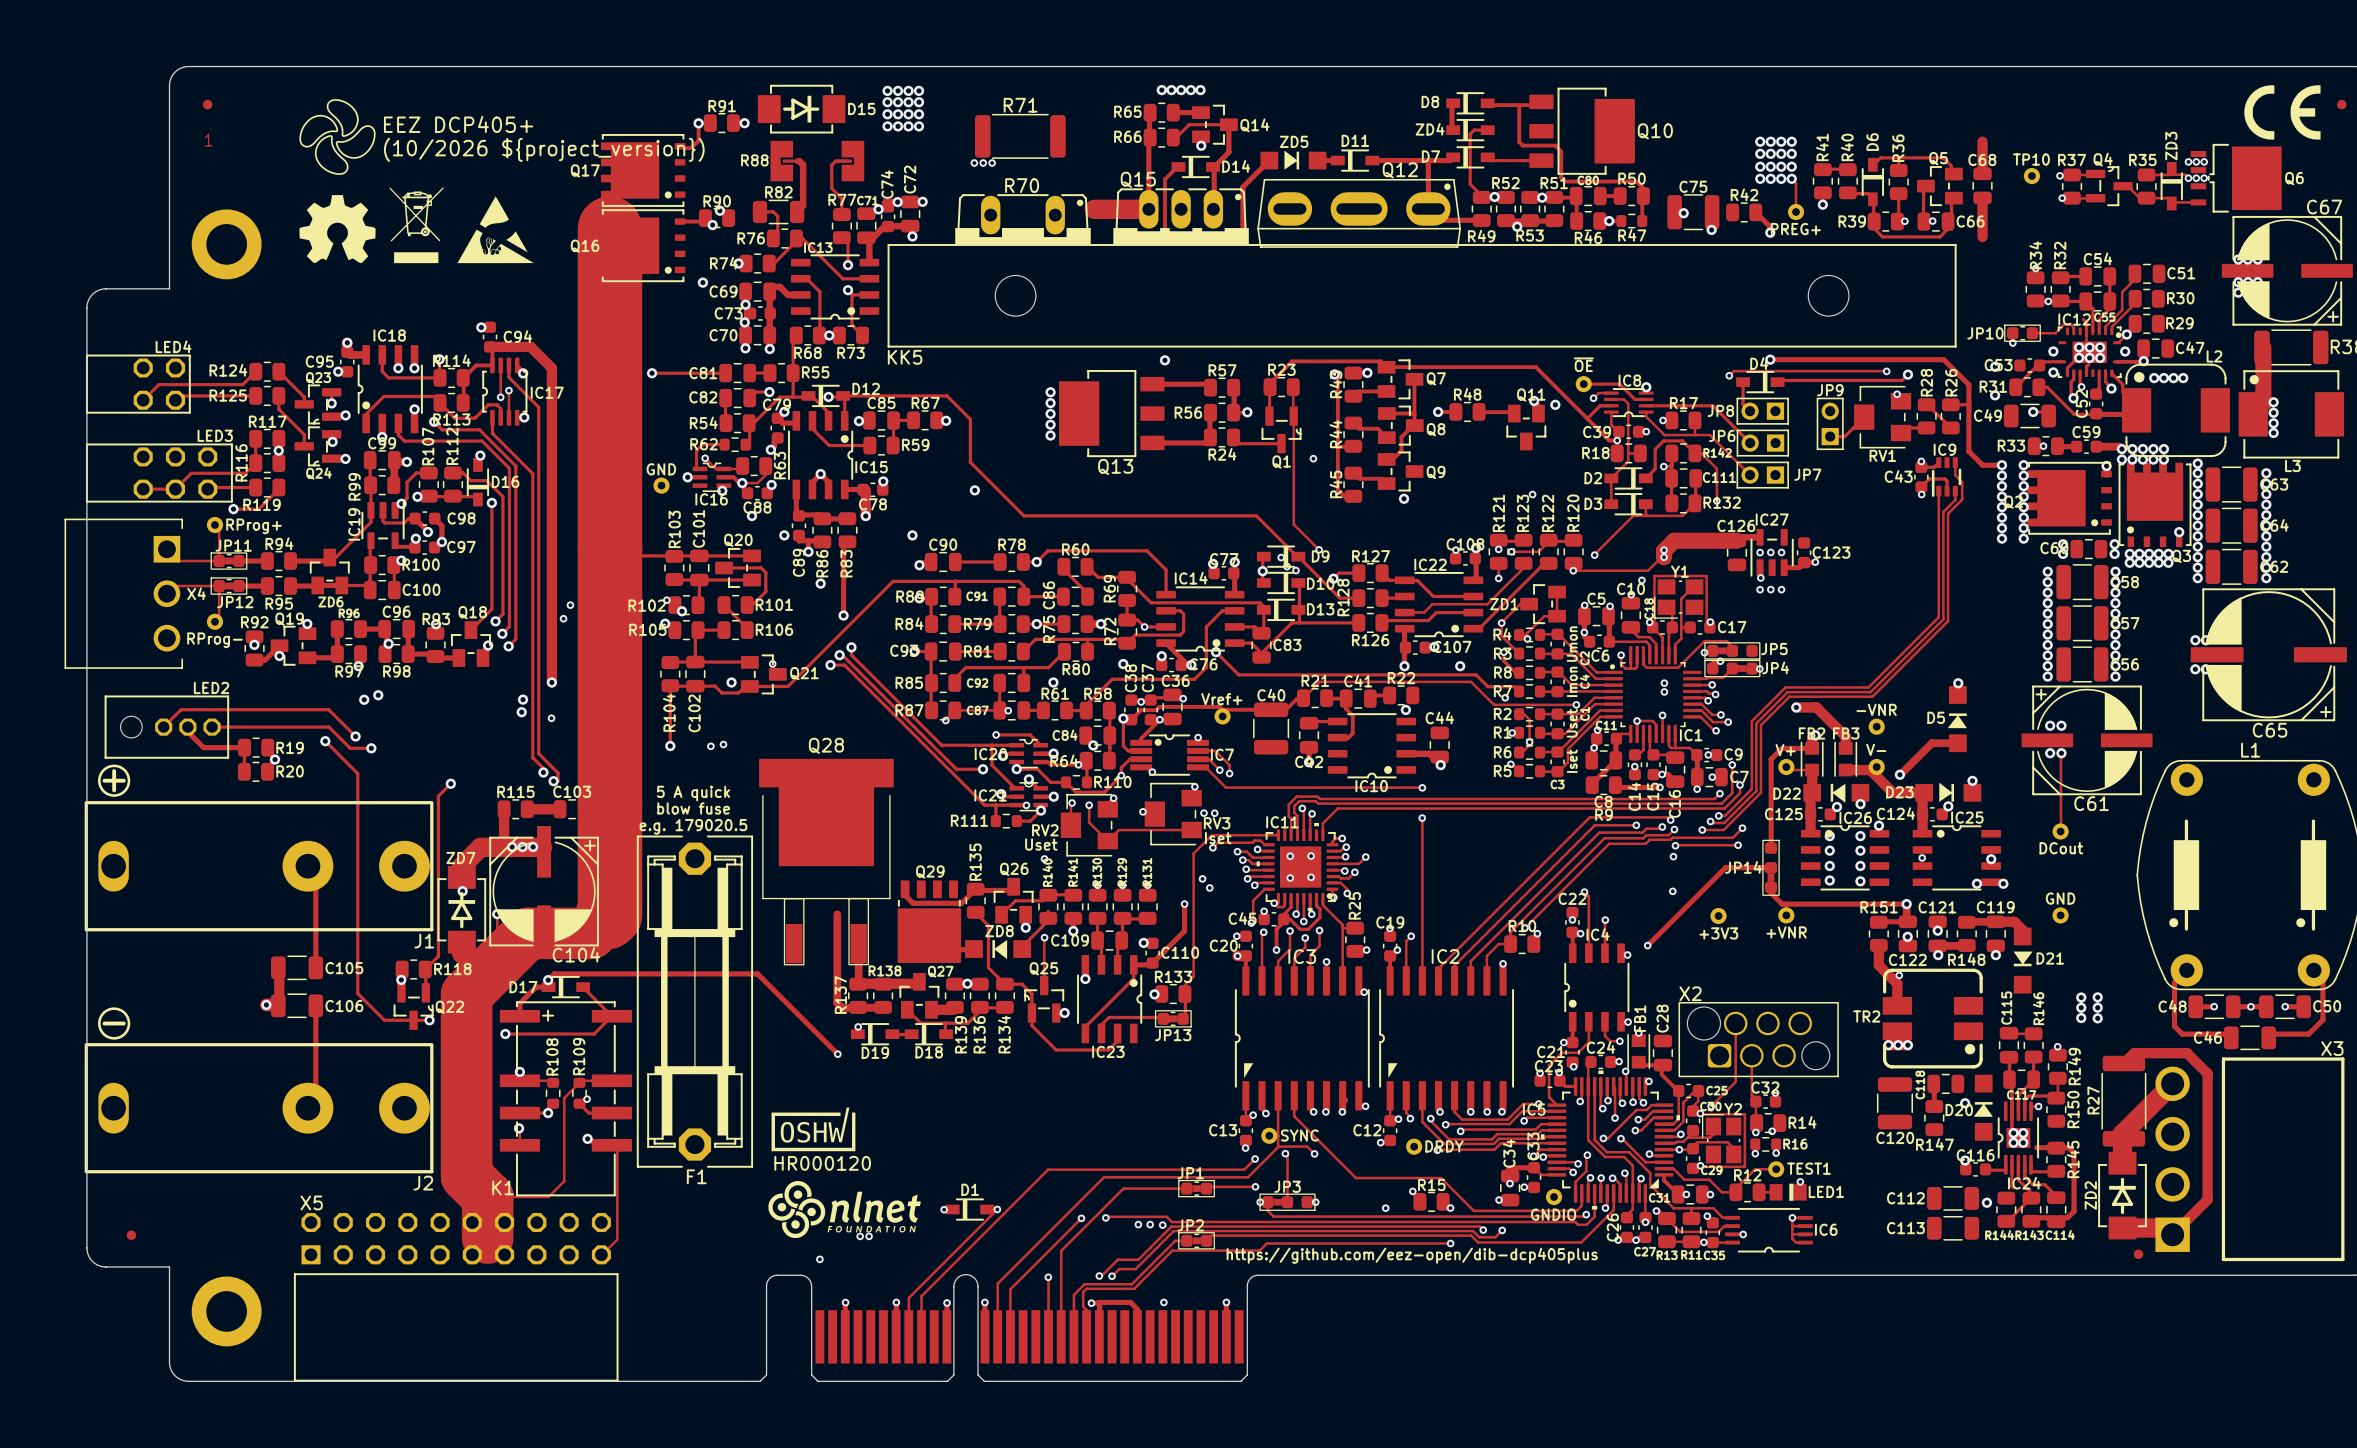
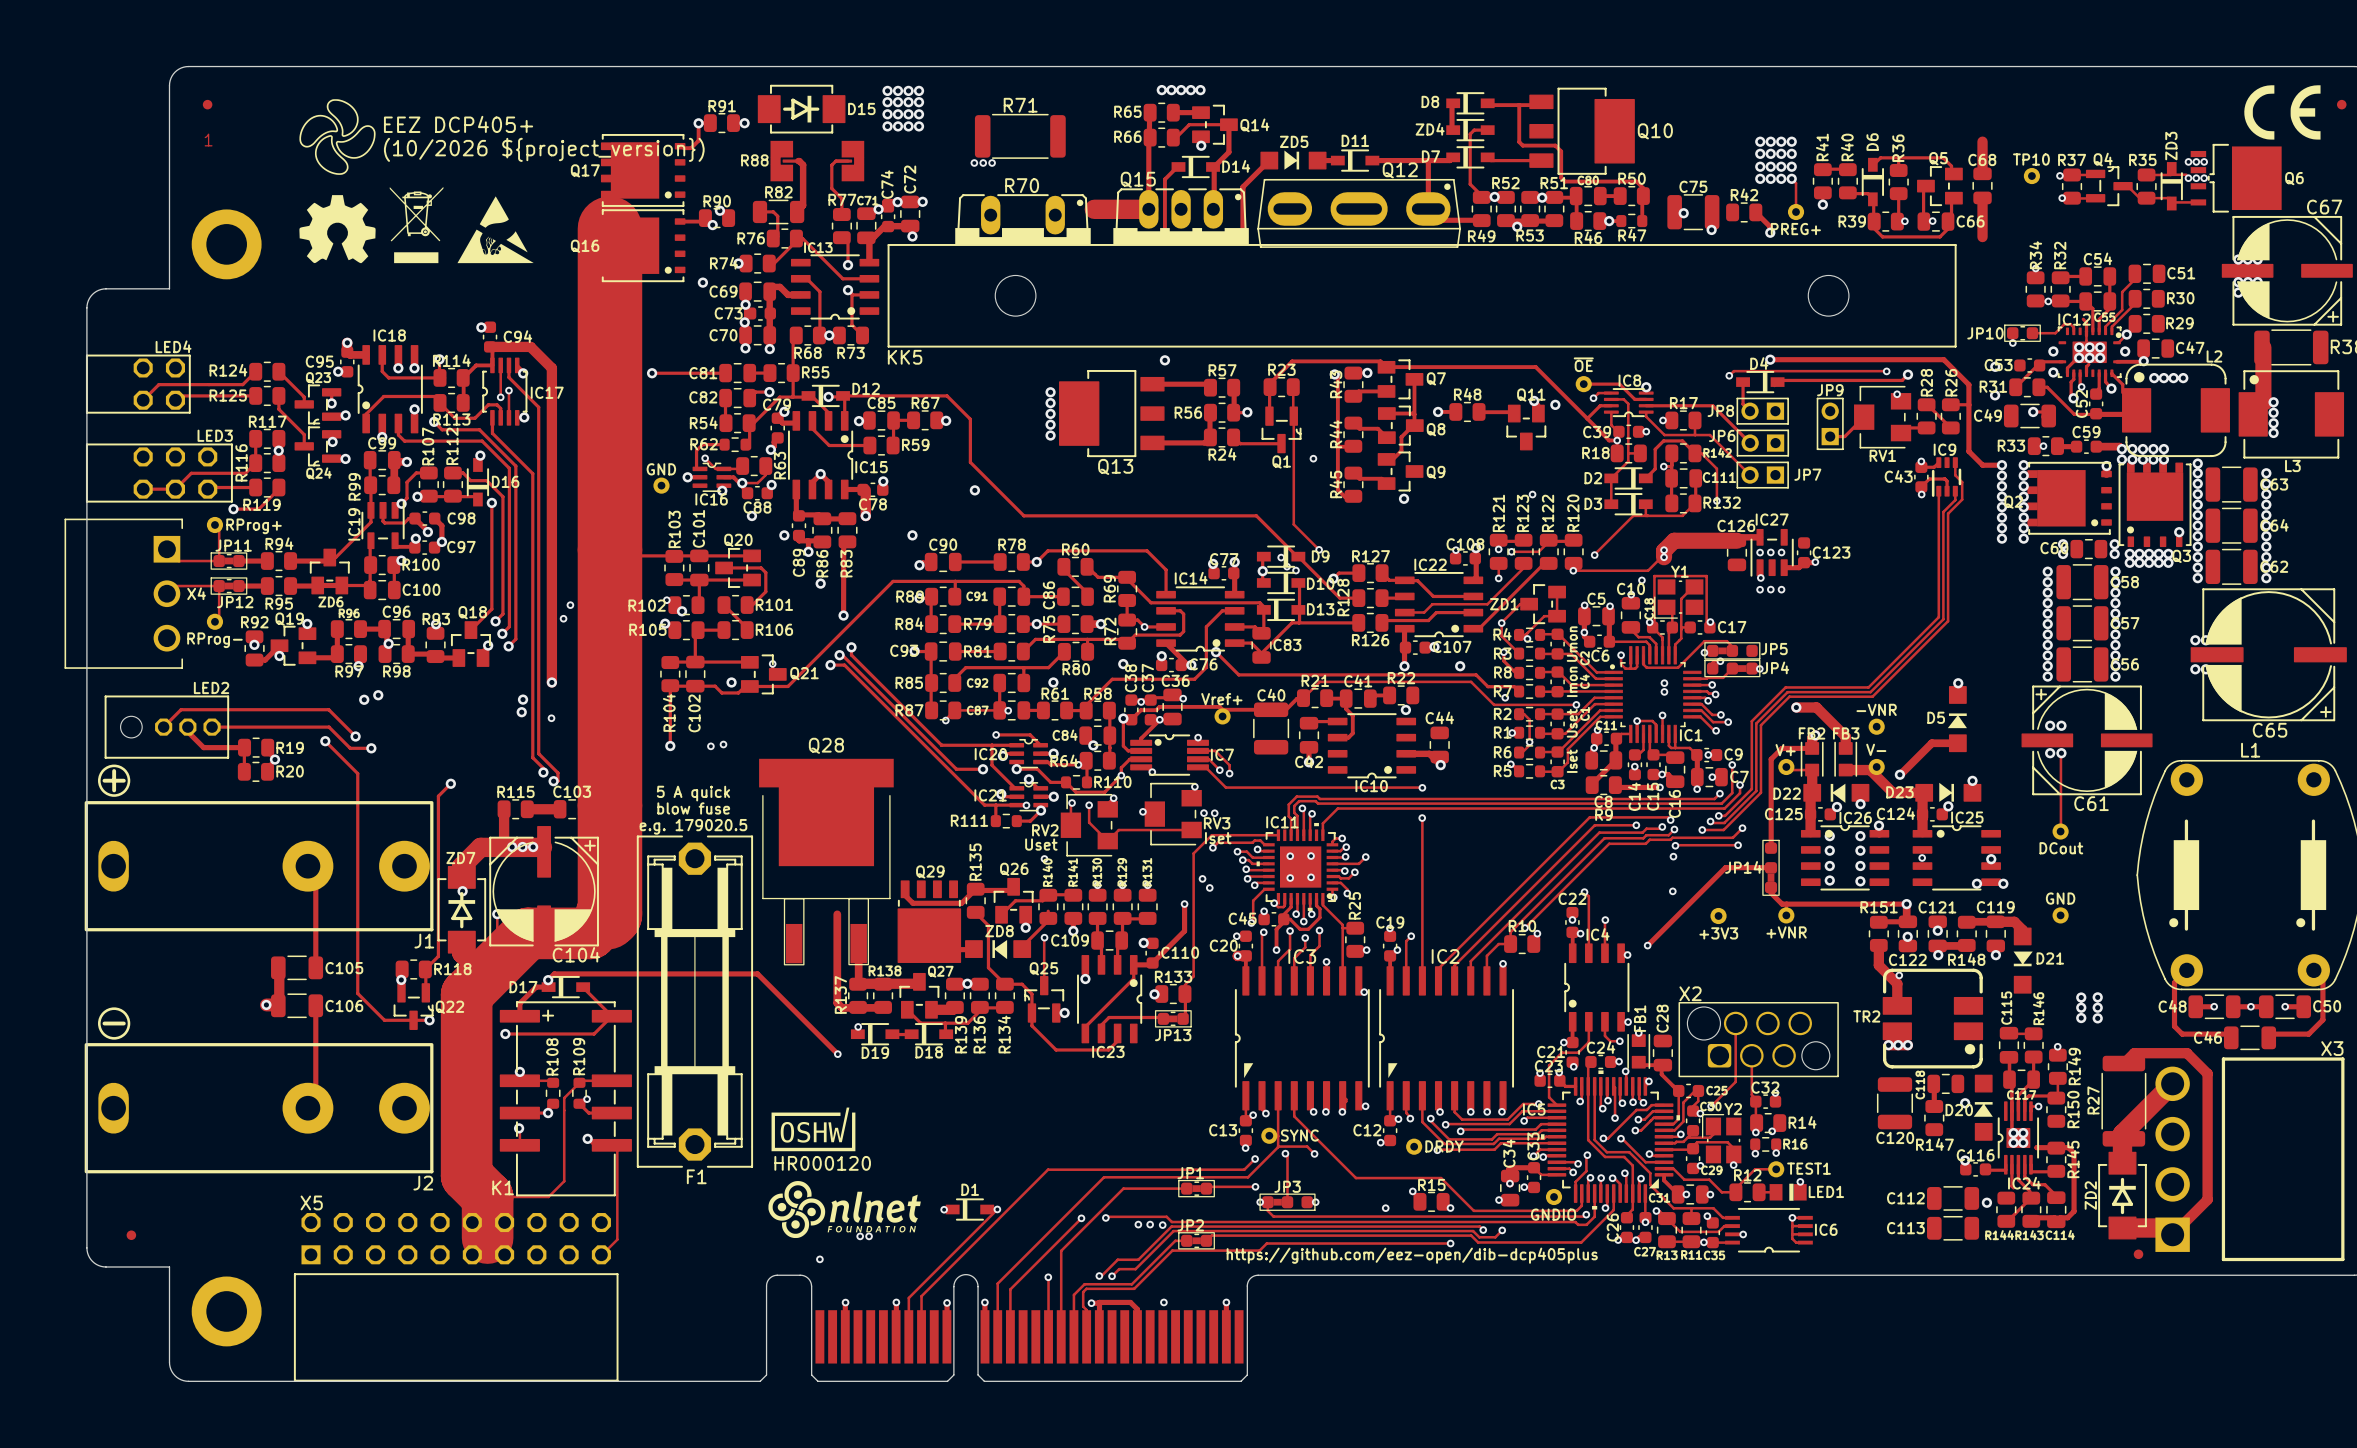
track: (1701, 1114) (1744, 1114) (1744, 1166) (1701, 1166) -> none
via position: (1679, 1149) -> (1733, 1165)

